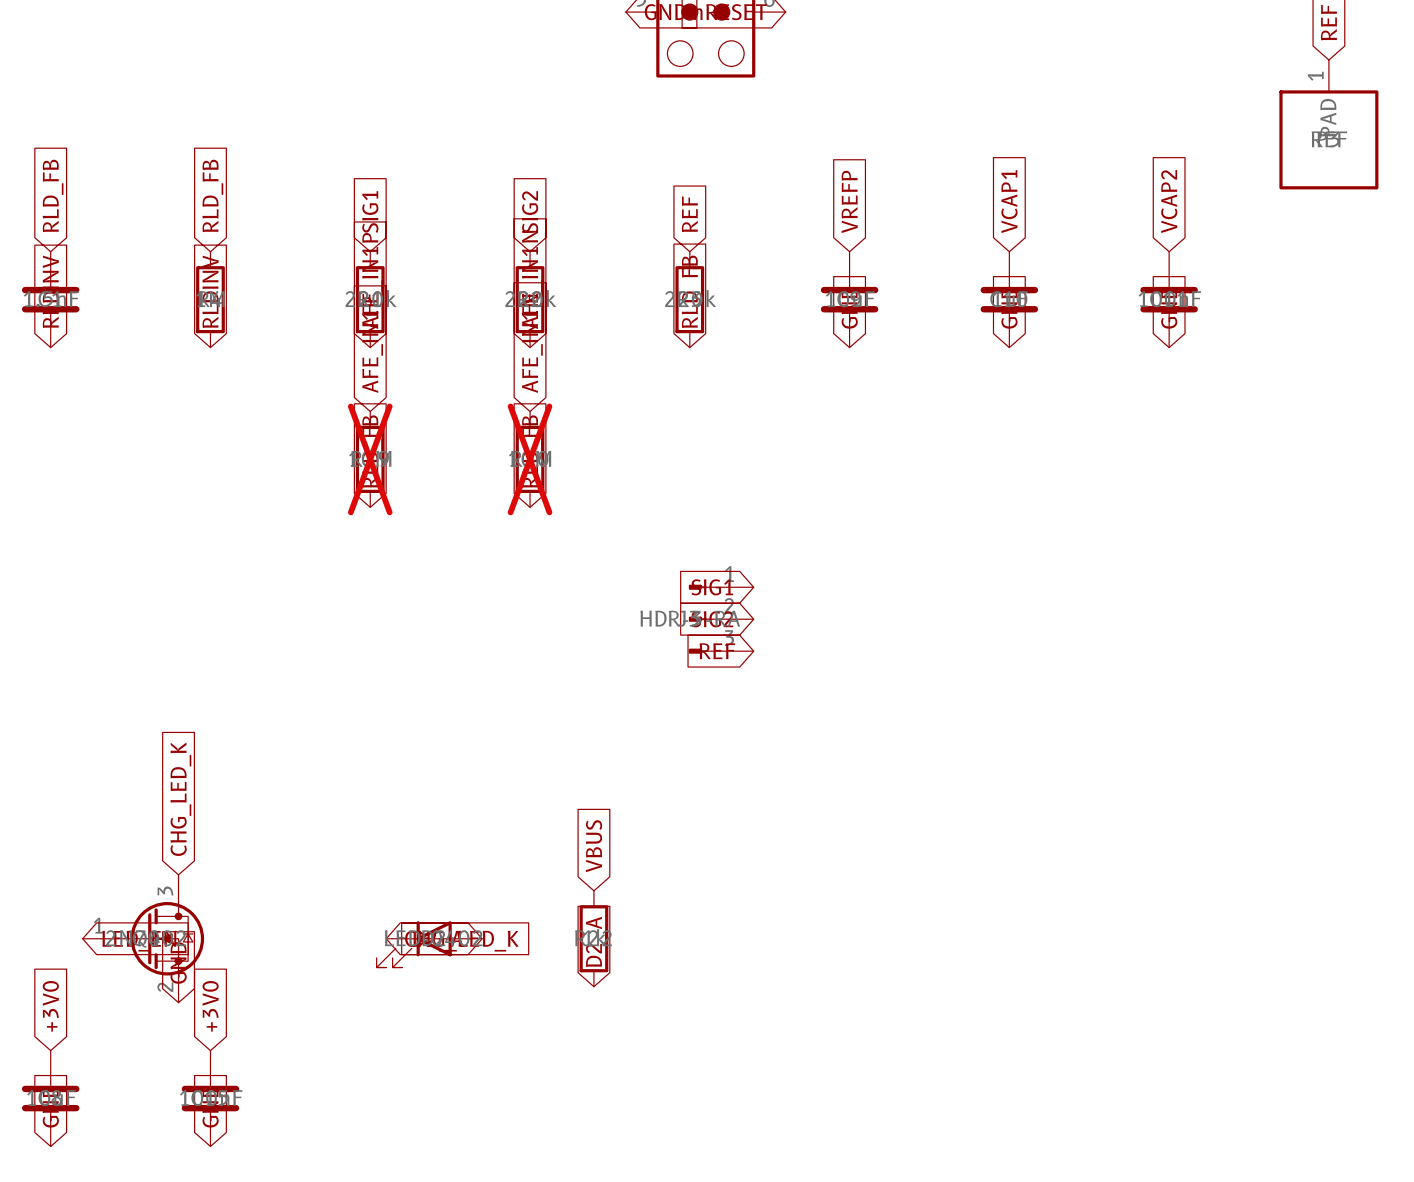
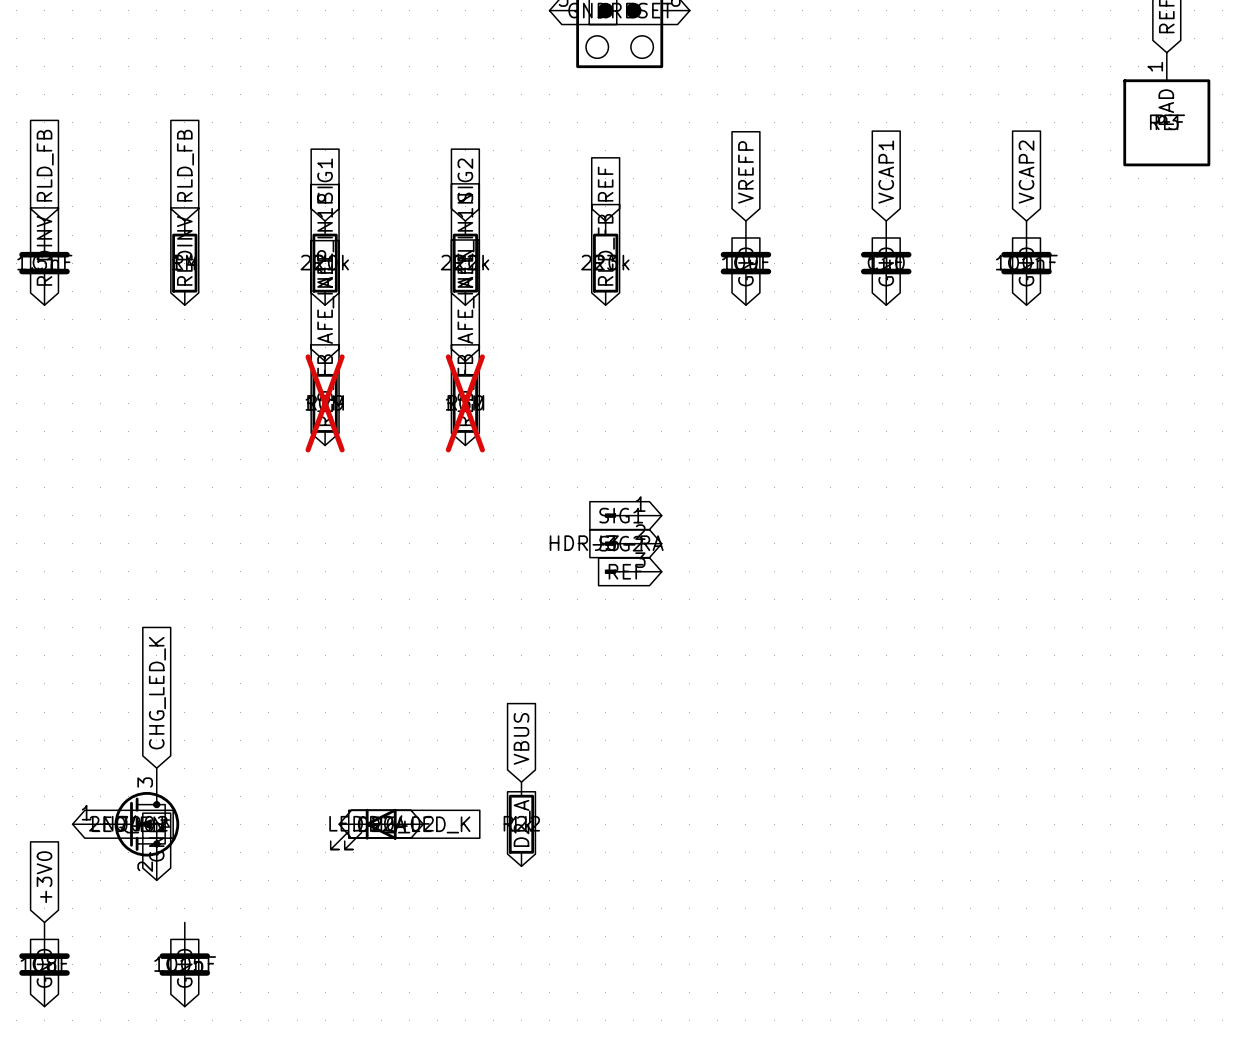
global label: +3V0 (210, 1006) -> none

